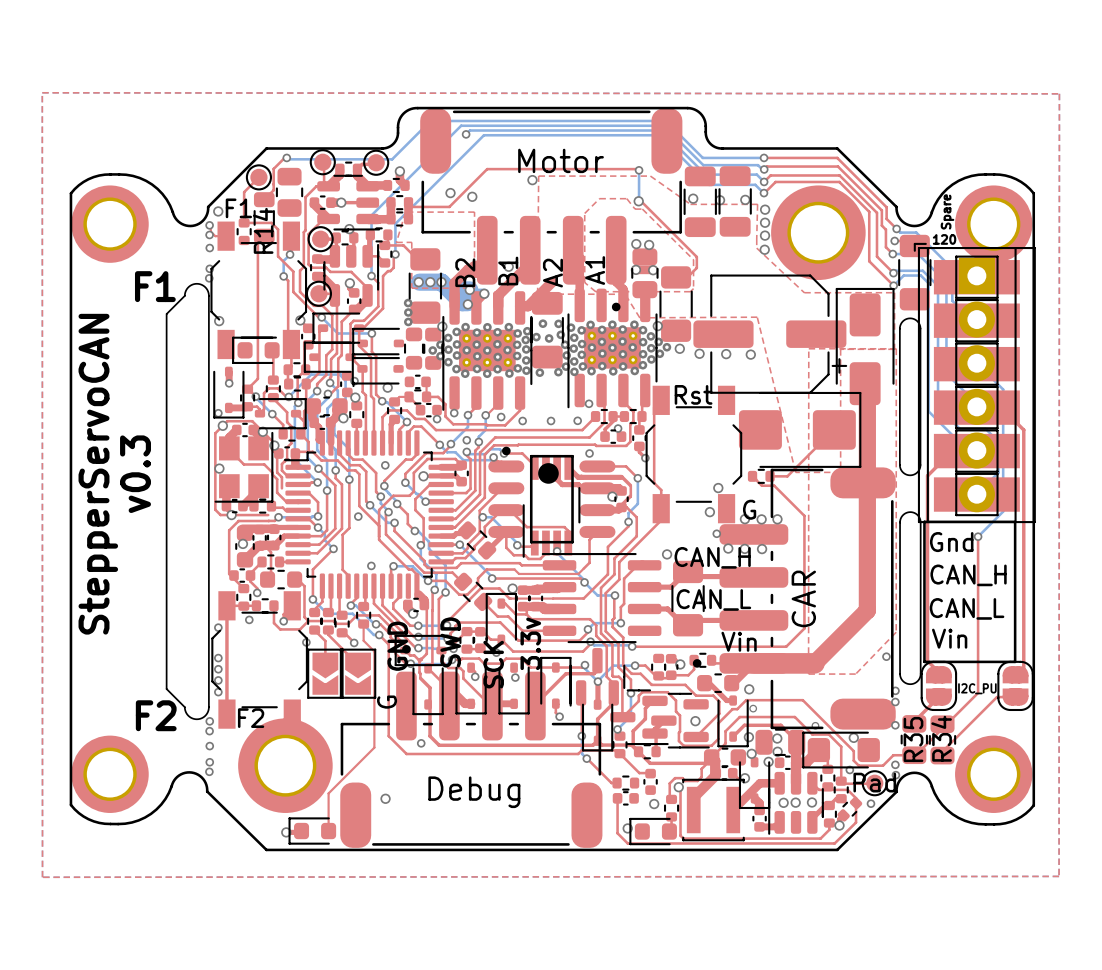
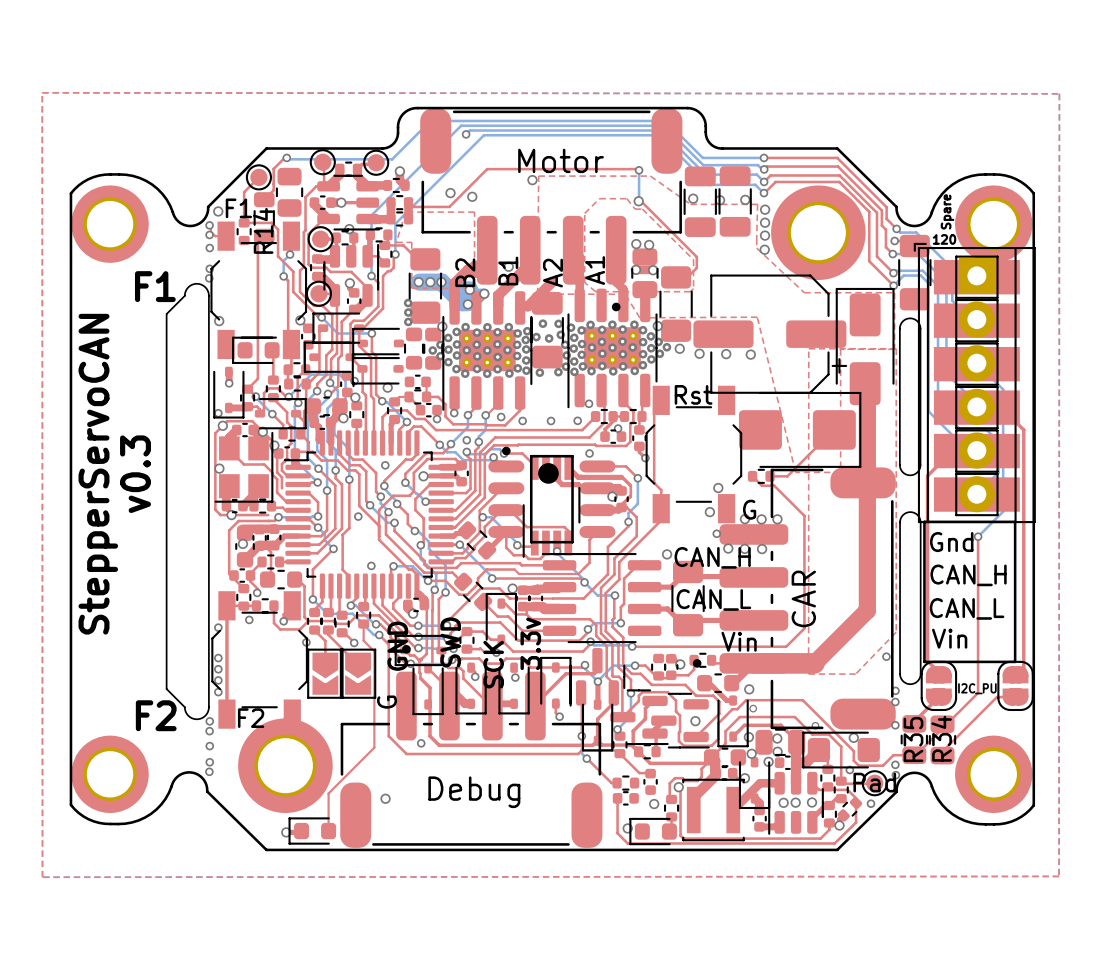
part: (480, 640) -> none

